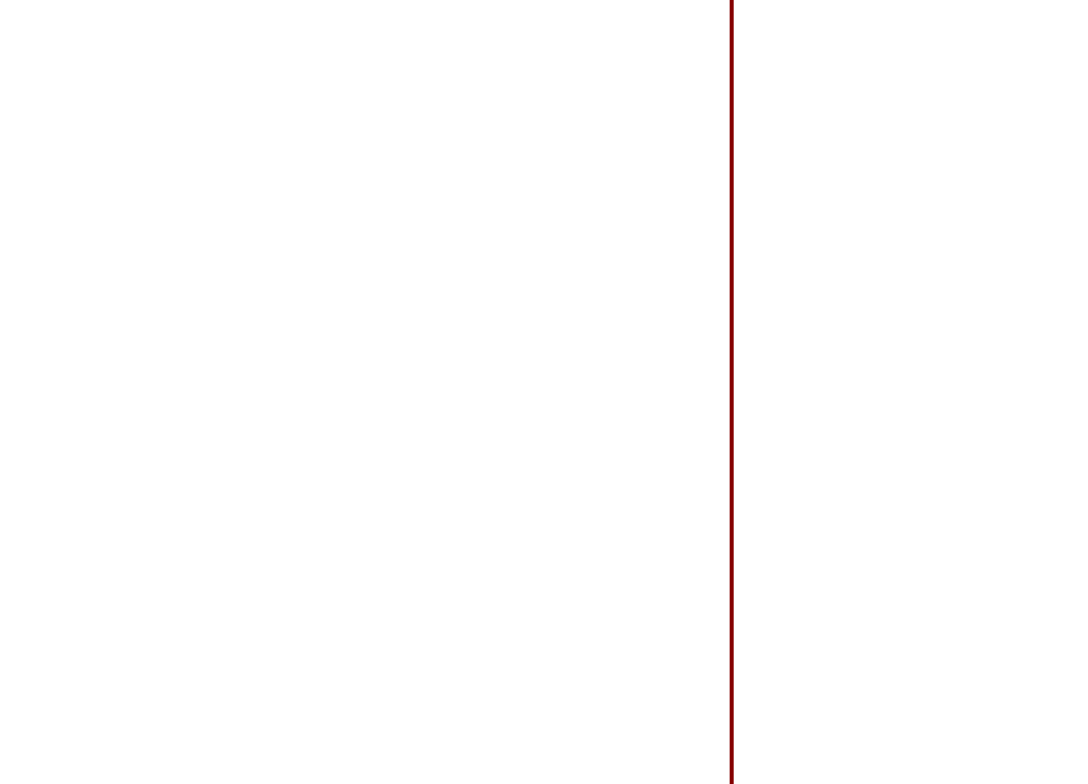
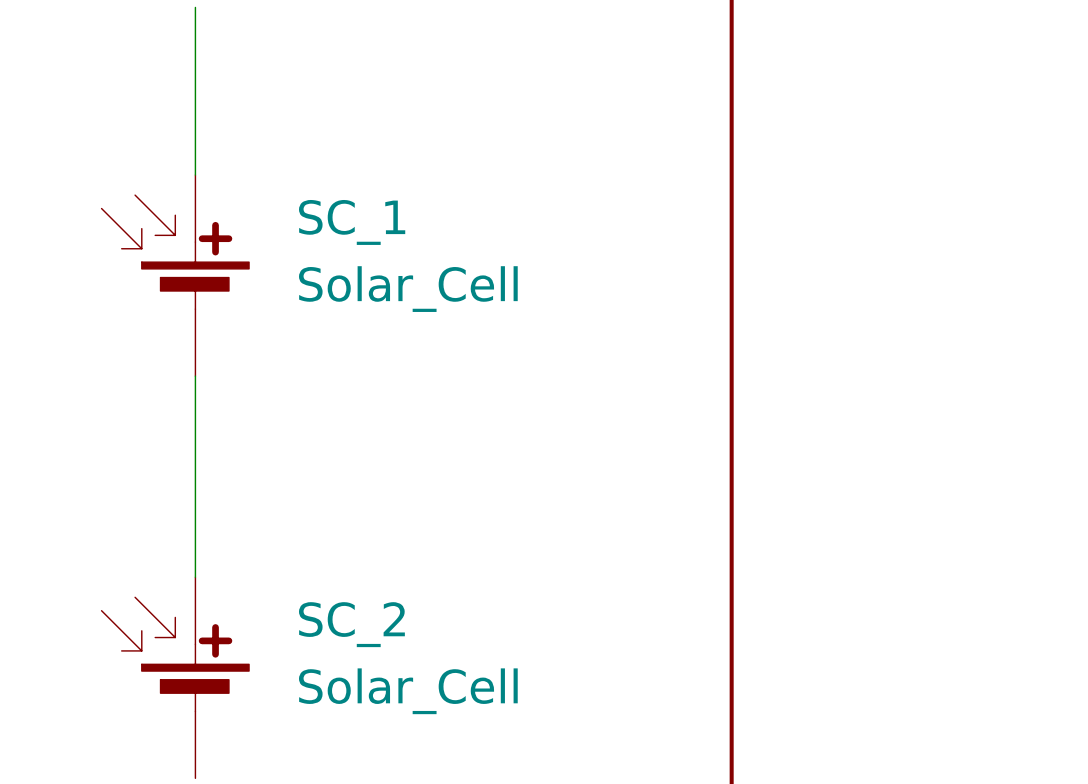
wire: none -> (195, 7) (195, 175)
SC_1: none -> Solar_Cell (175, 275)
wire: none -> (195, 376) (195, 577)
SC_2: none -> Solar_Cell (175, 677)

